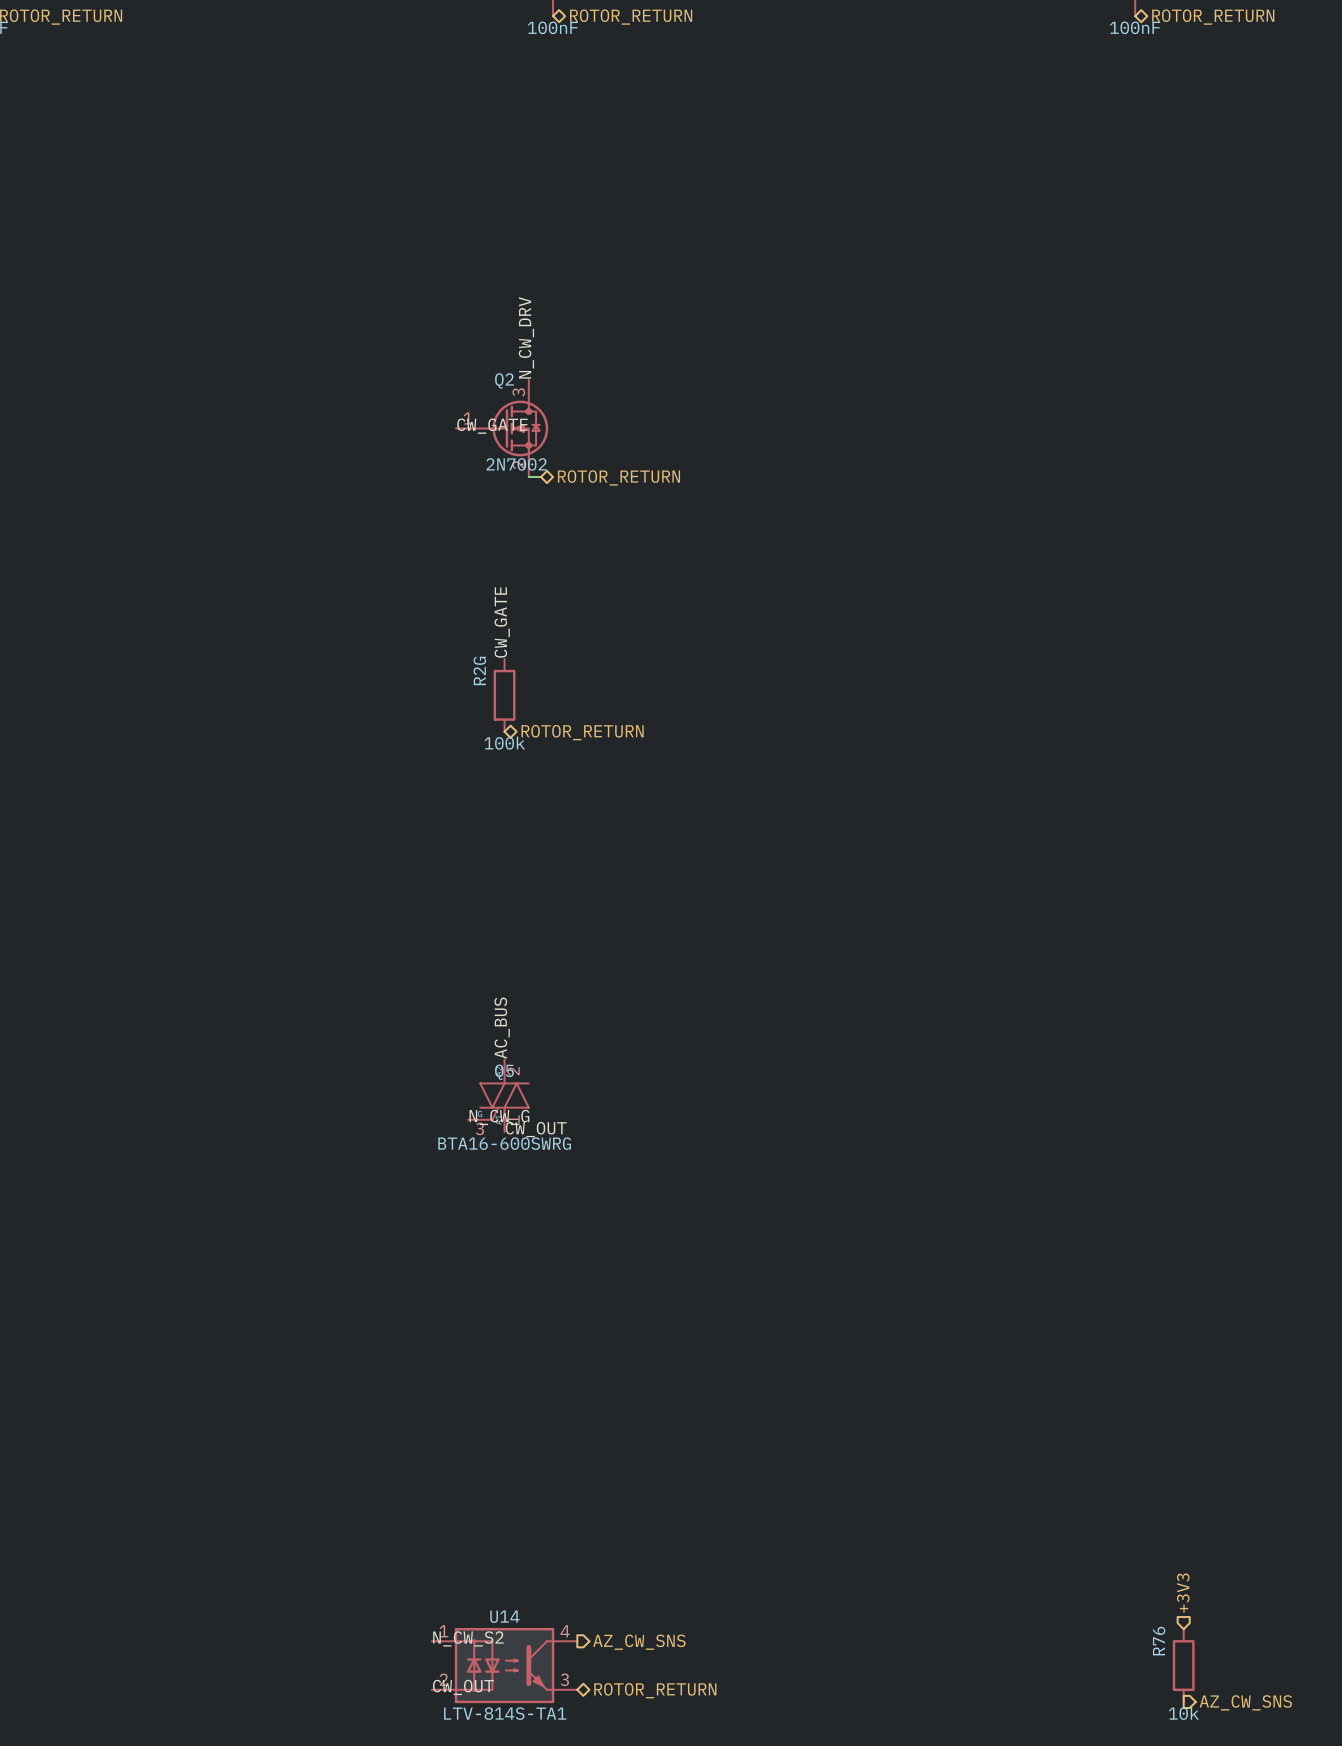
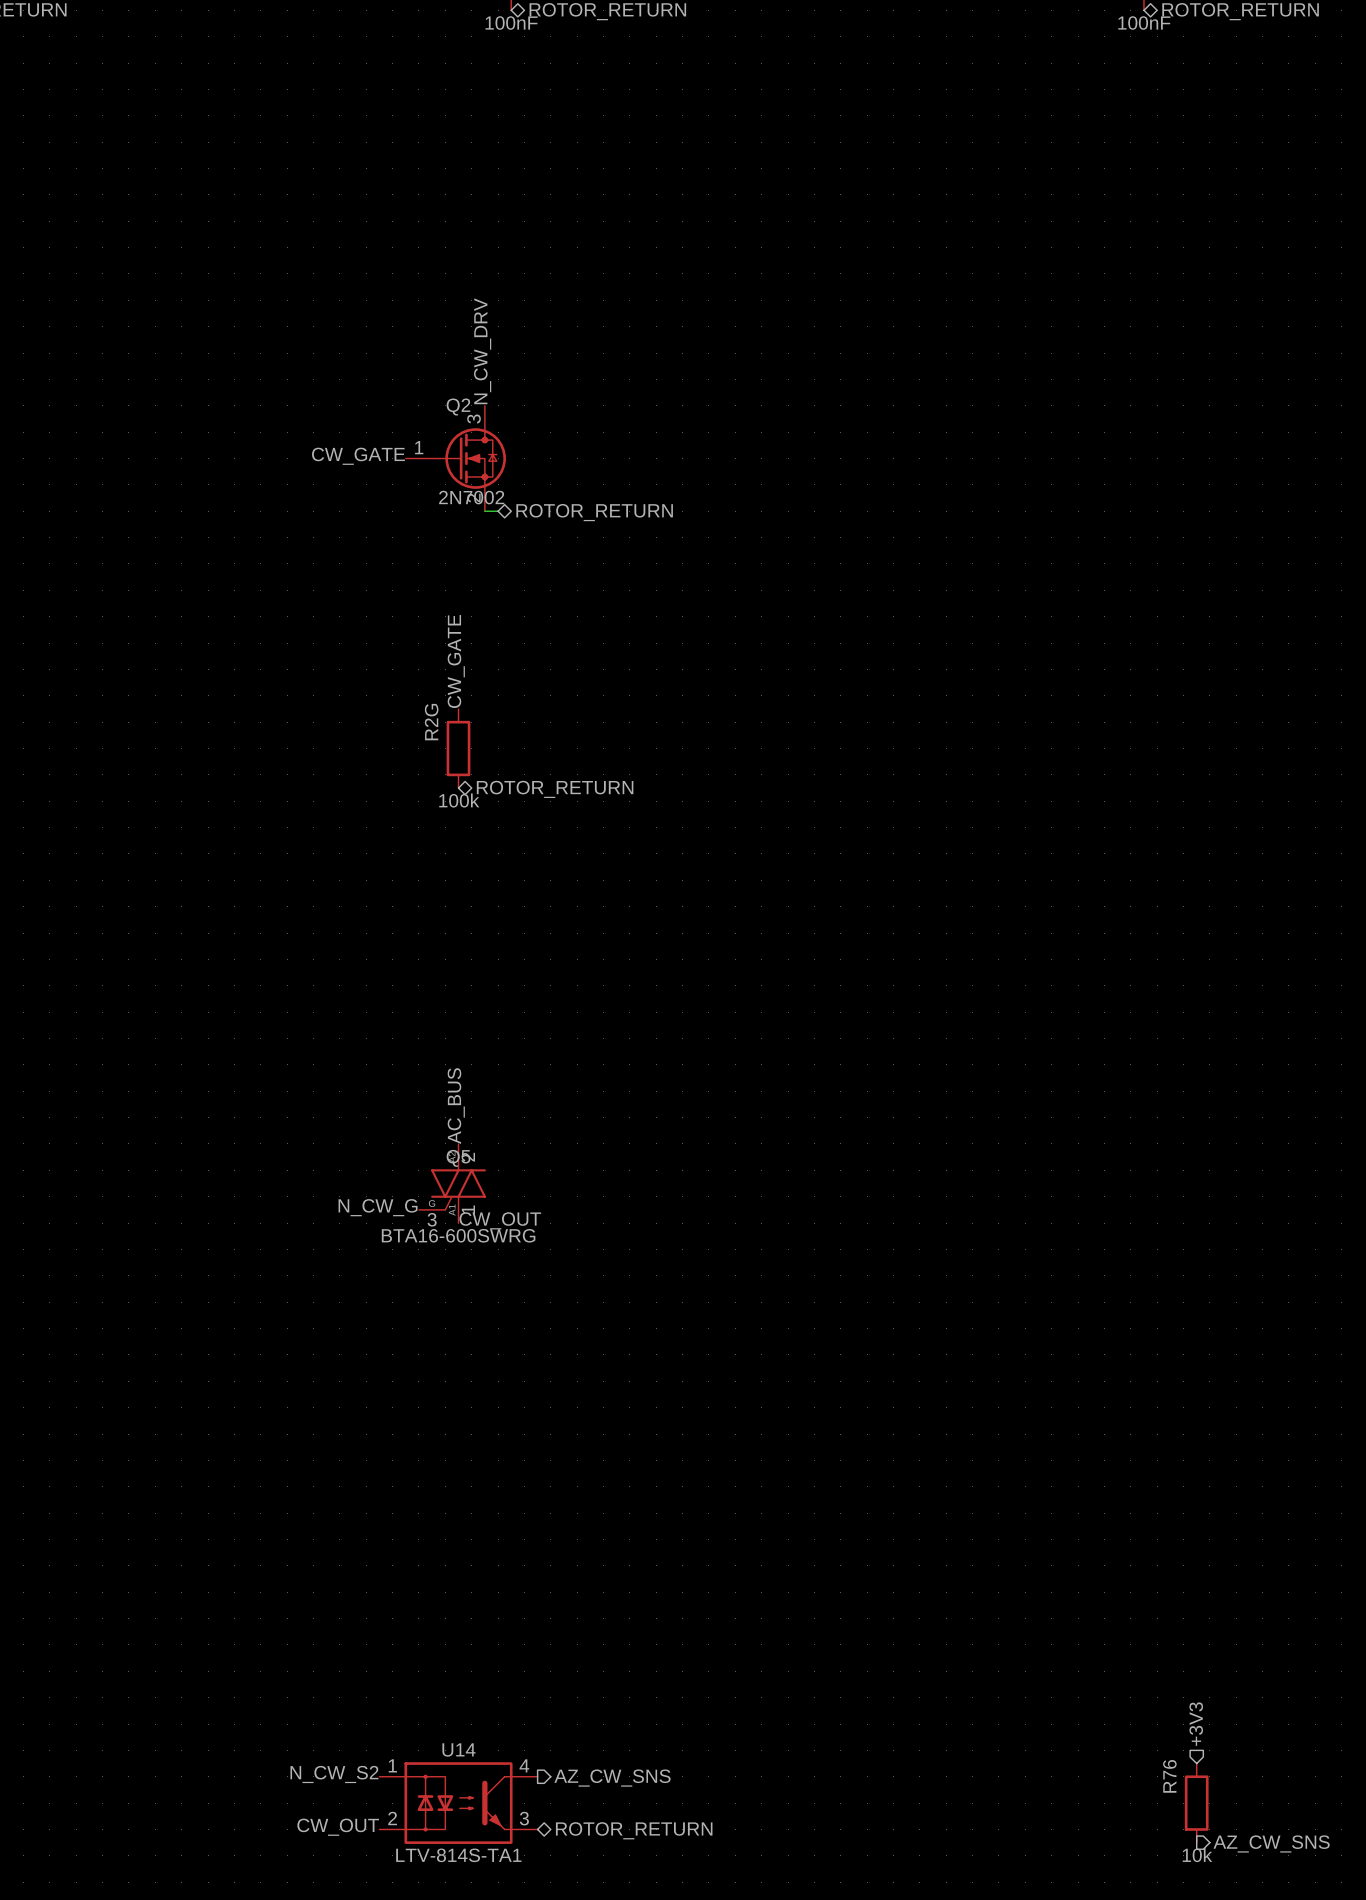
label position: CW_GATE (492, 426) -> CW_GATE (358, 456)
label position: N_CW_G (499, 1117) -> N_CW_G (378, 1207)
label position: N_CW_S2 (468, 1638) -> N_CW_S2 (334, 1774)
label position: CW_OUT (463, 1687) -> CW_OUT (338, 1827)

